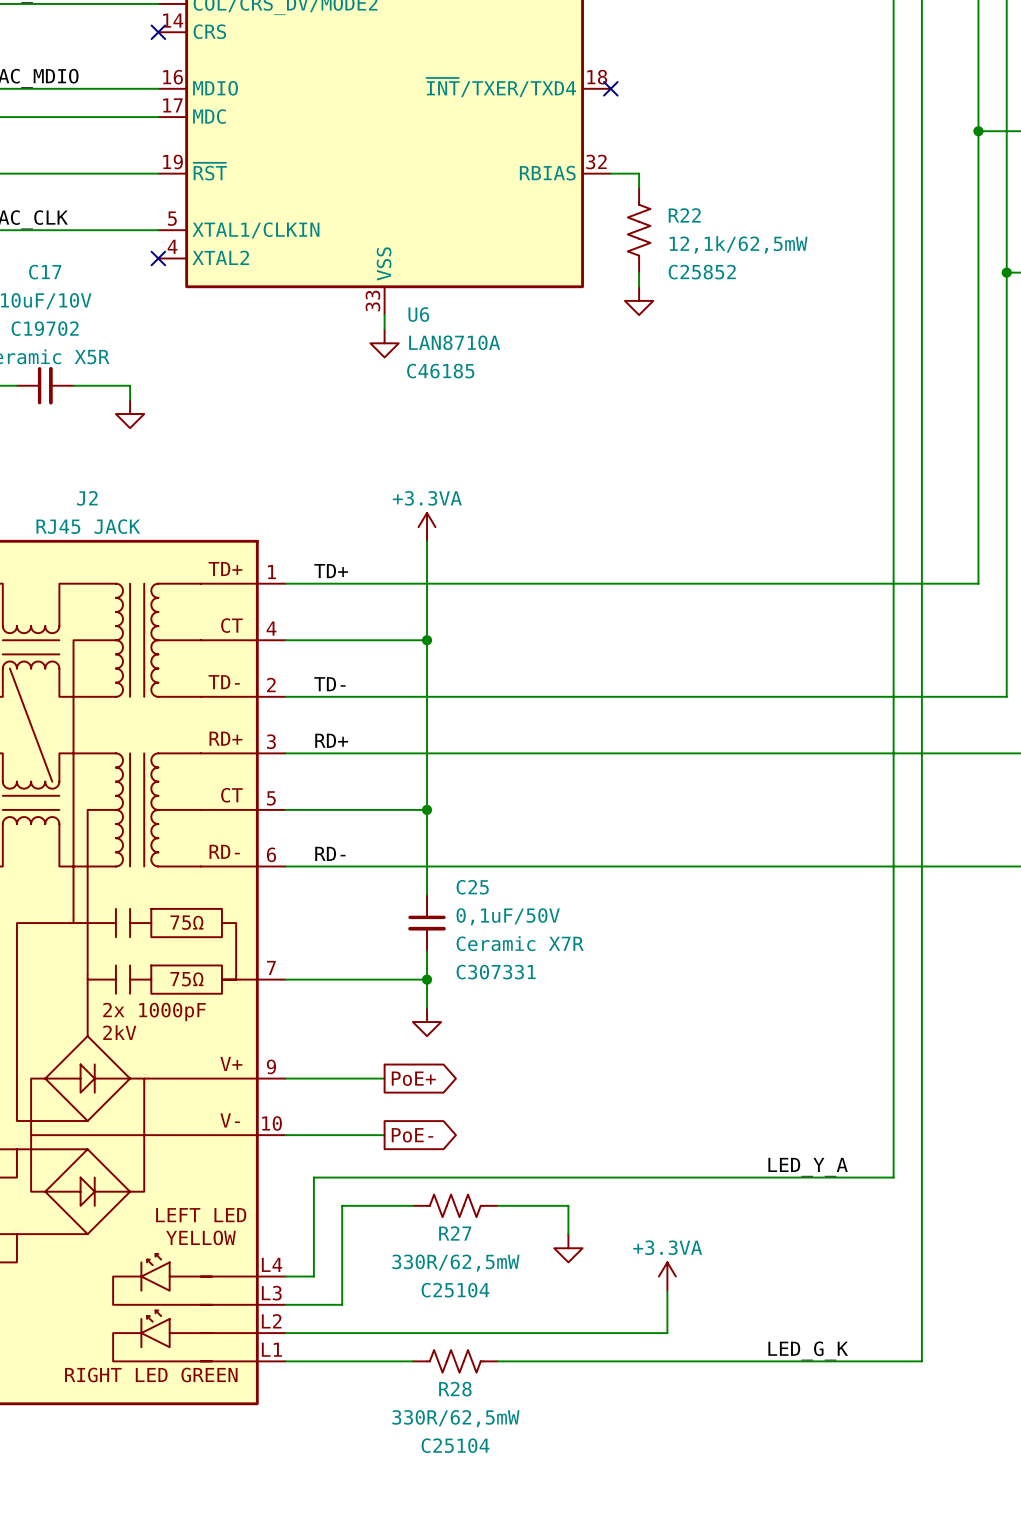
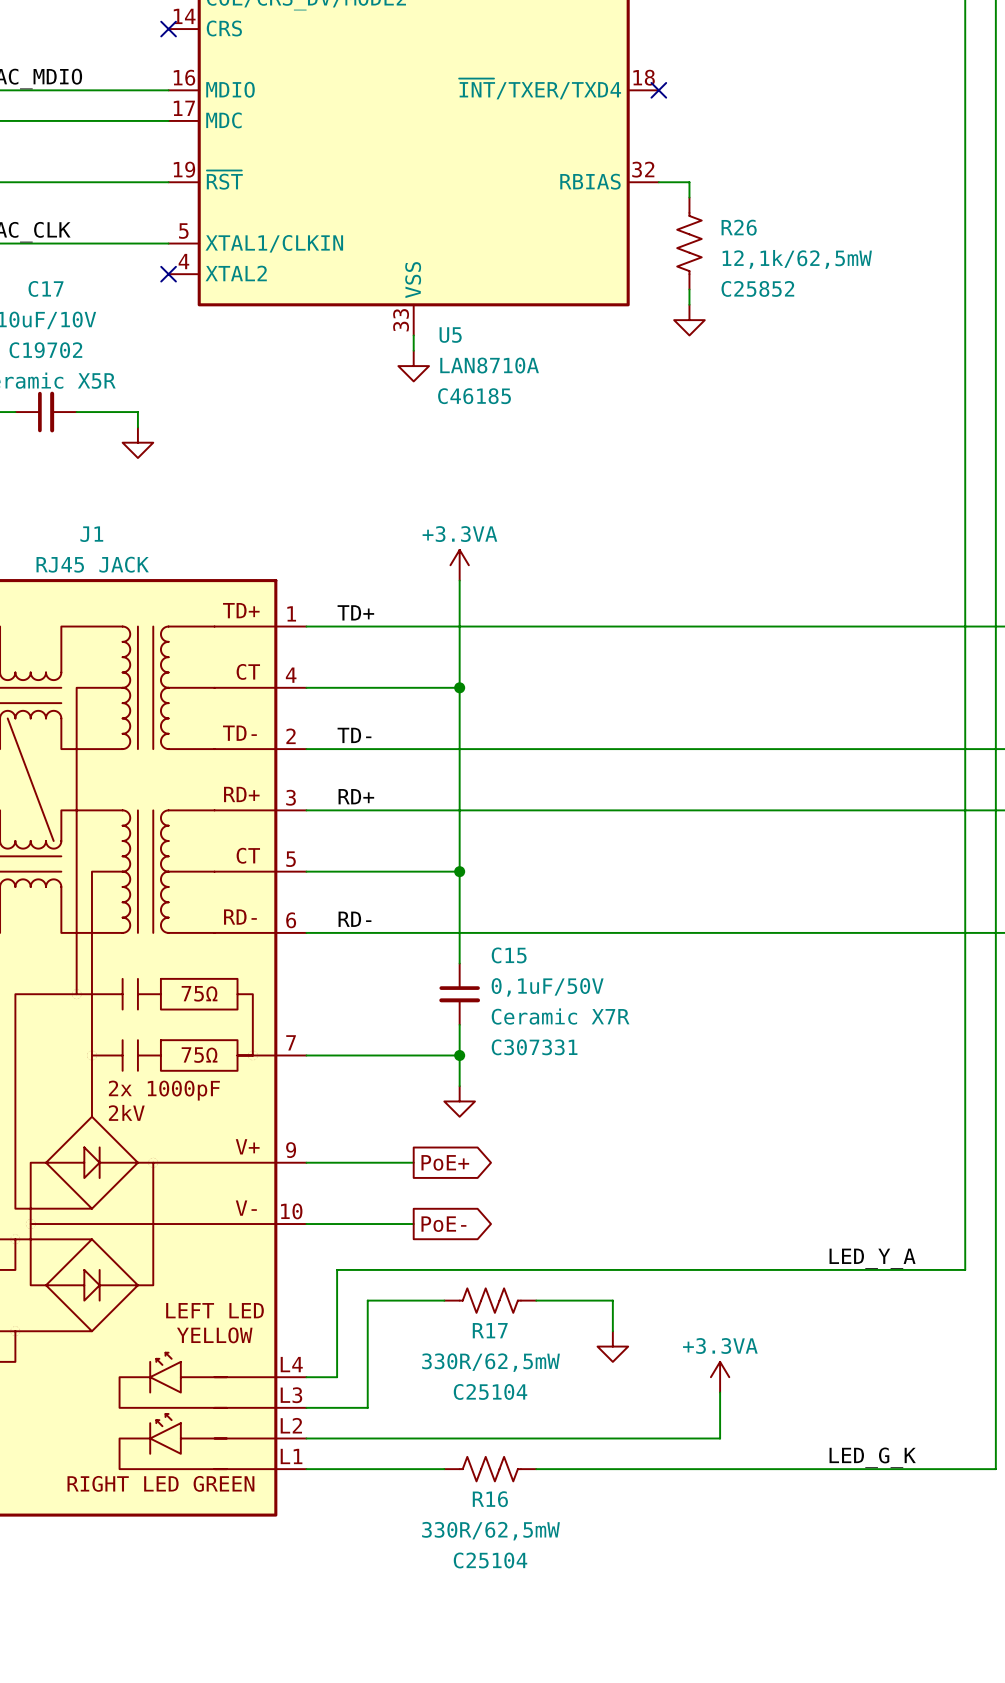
R22 name: R22 (684, 215) -> R26 (739, 227)
U6 name: U6 (418, 314) -> U5 (450, 335)
J2 name: J2 (87, 498) -> J1 (91, 534)
C25 name: C25 (472, 887) -> C15 (509, 955)
R27 name: R27 (455, 1233) -> R17 (490, 1330)
R28 name: R28 (455, 1389) -> R16 (490, 1499)

